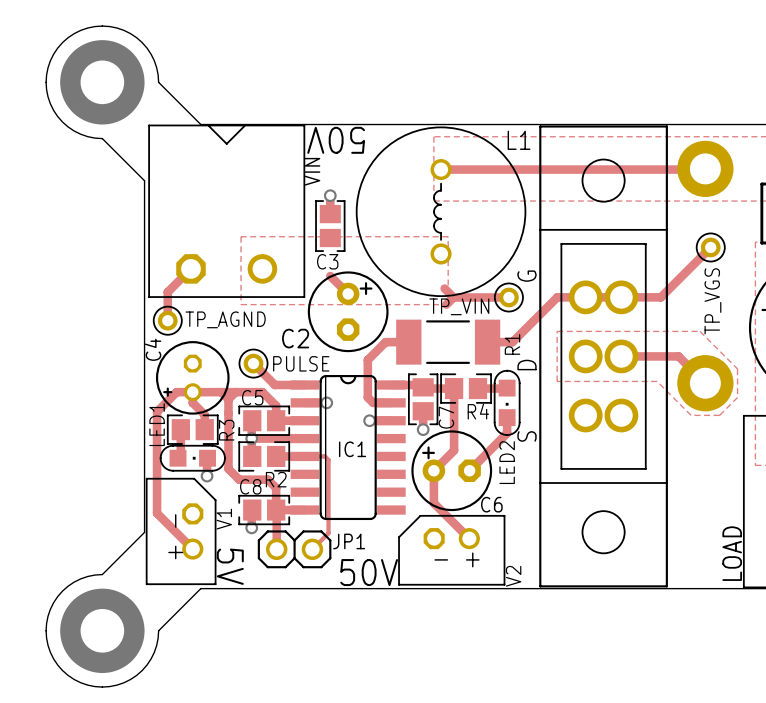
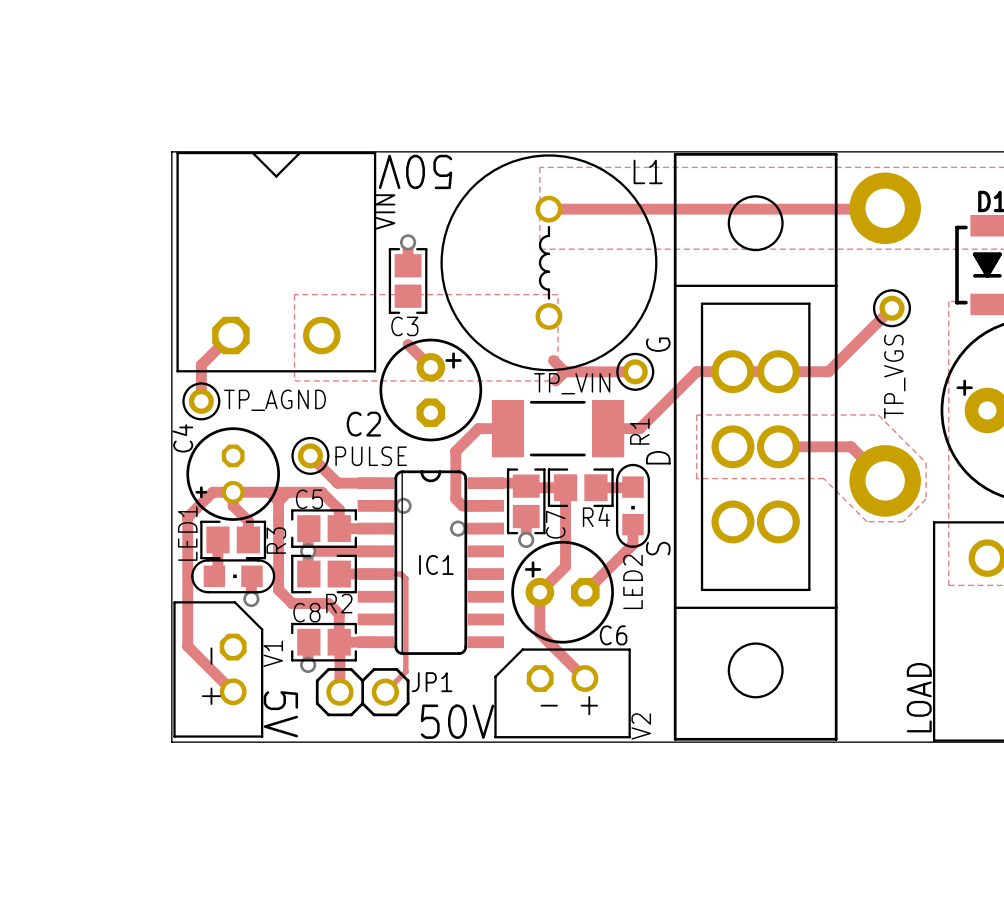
via: (102, 82) -> none
board edge: (200, 124) (158, 82) (156, 67) (151, 54) (142, 42) (130, 33) (109, 26) (95, 26) (74, 33) (62, 42) (53, 54) (46, 74) (46, 89) (53, 110) (62, 122) (74, 131) (87, 136) (102, 138) (144, 180) -> (243, 151) (171, 151) (171, 223)
board edge: (144, 532) (102, 574) (87, 576) (74, 582) (62, 591) (53, 602) (46, 623) (46, 638) (53, 658) (62, 670) (74, 679) (95, 686) (109, 686) (130, 679) (142, 670) (151, 658) (156, 645) (158, 630) (200, 588) -> (171, 670) (171, 742) (243, 742)
via: (102, 630) -> none

